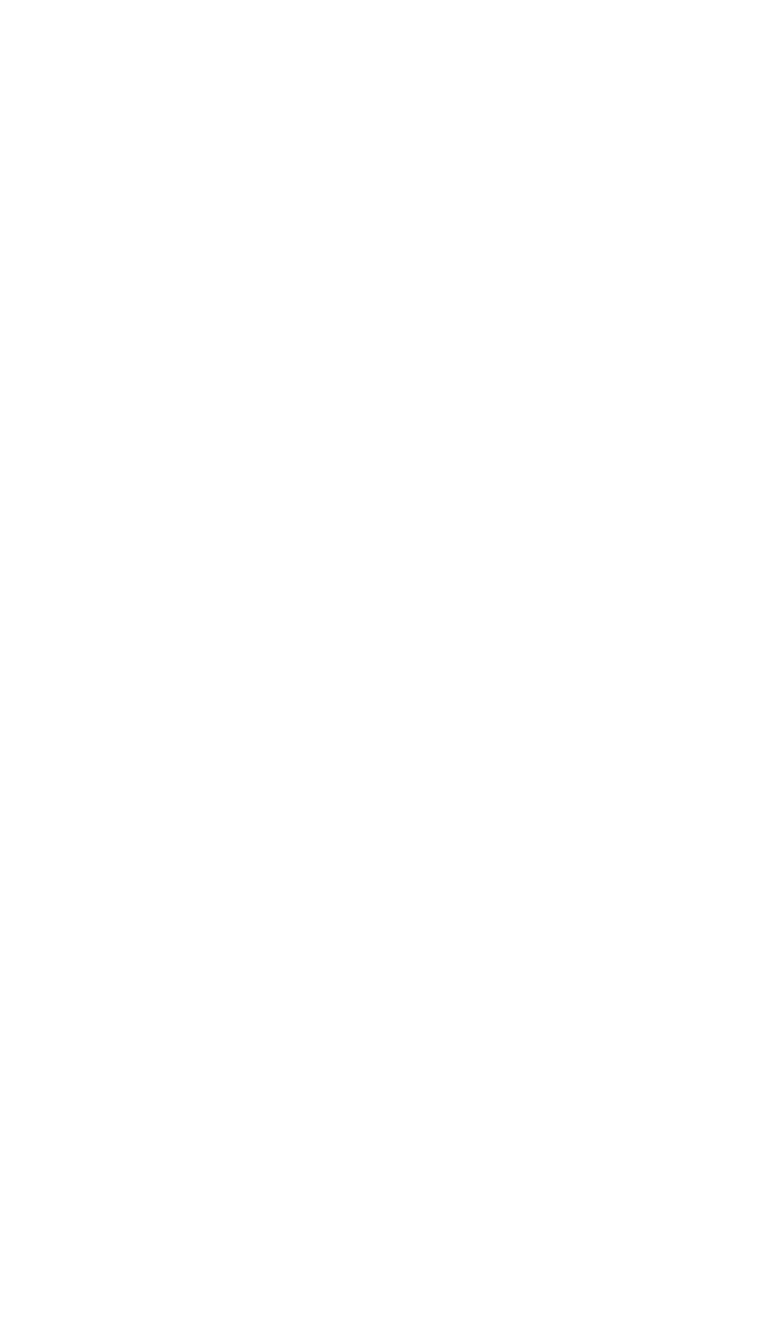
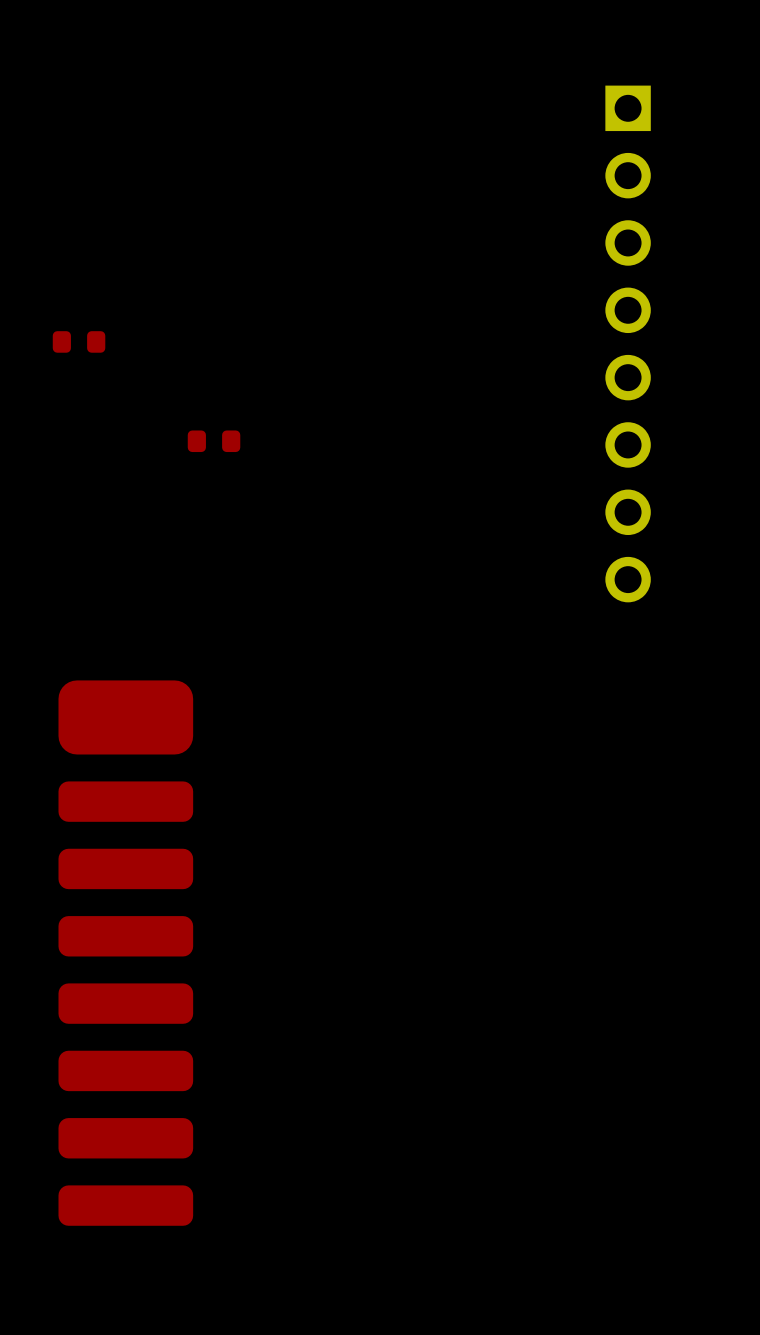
part: none -> (79, 341)
part: none -> (628, 343)
part: none -> (214, 441)
part: none -> (125, 953)

